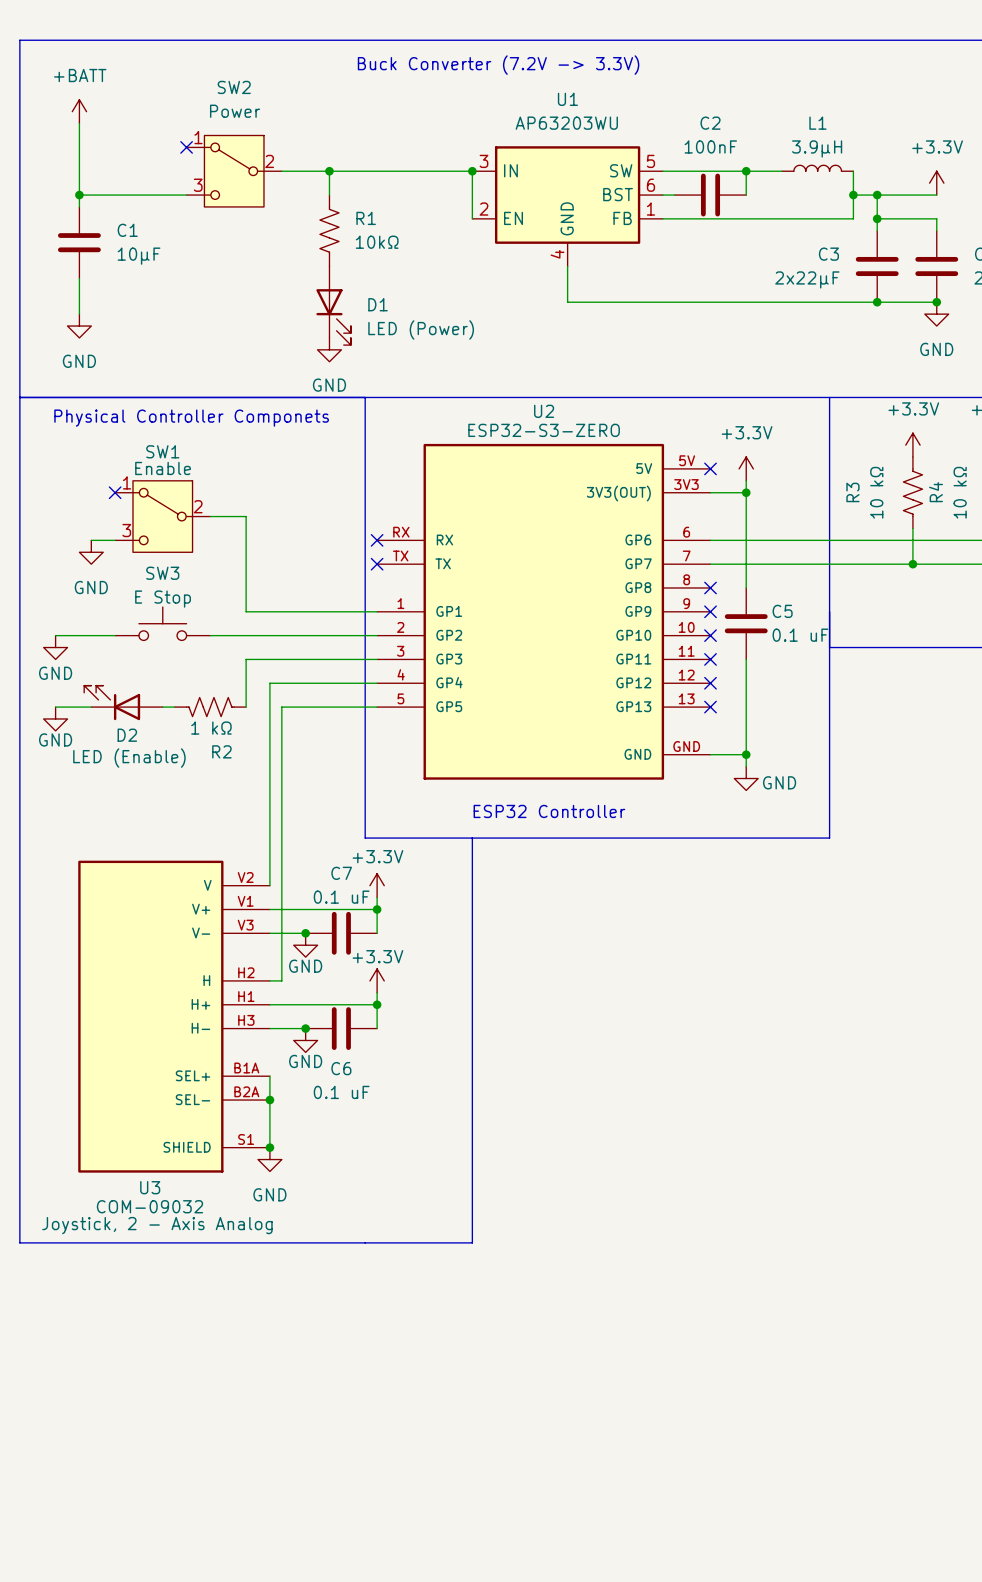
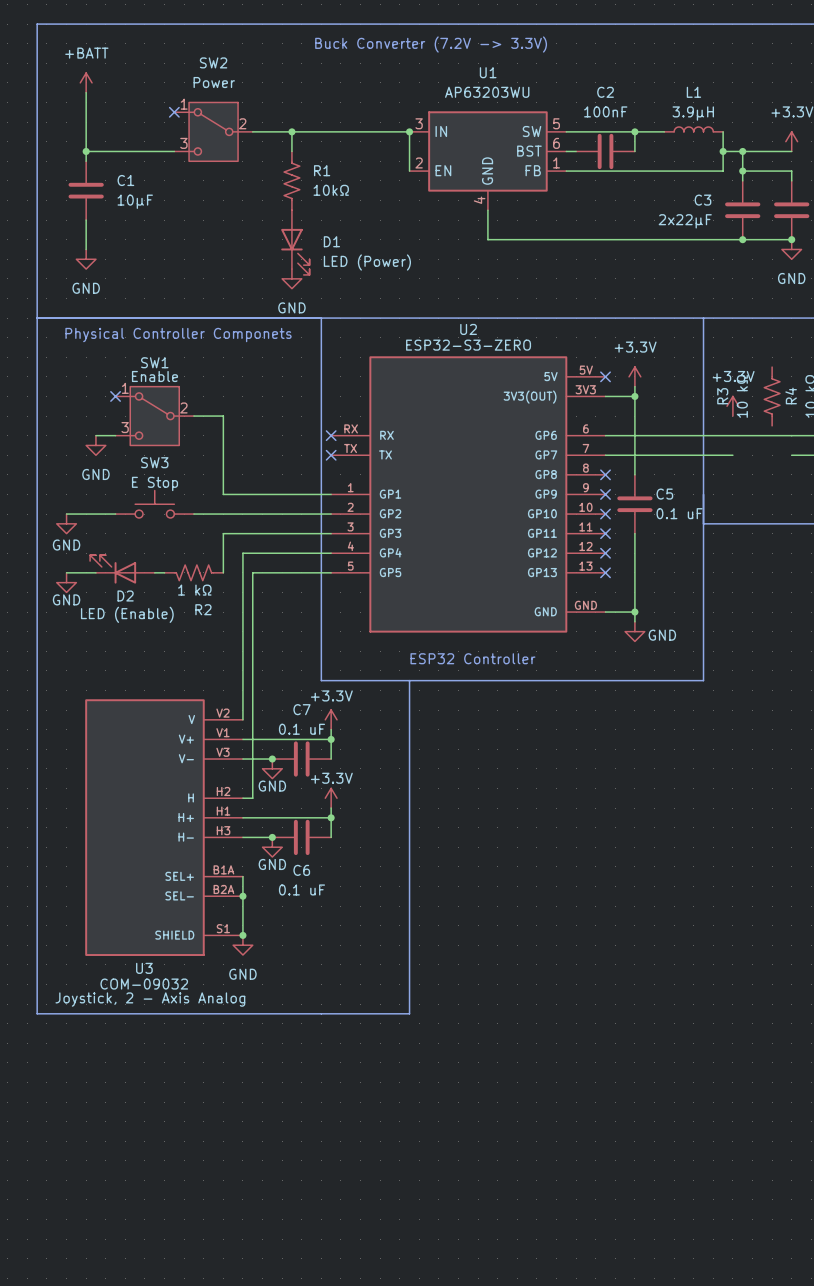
power symbol position: +3.3V (912, 445) -> +3.3V (732, 406)
wire: (912, 528) (912, 564) -> none
wire: (865, 564) (936, 564) -> none
junction: (912, 564) -> none

